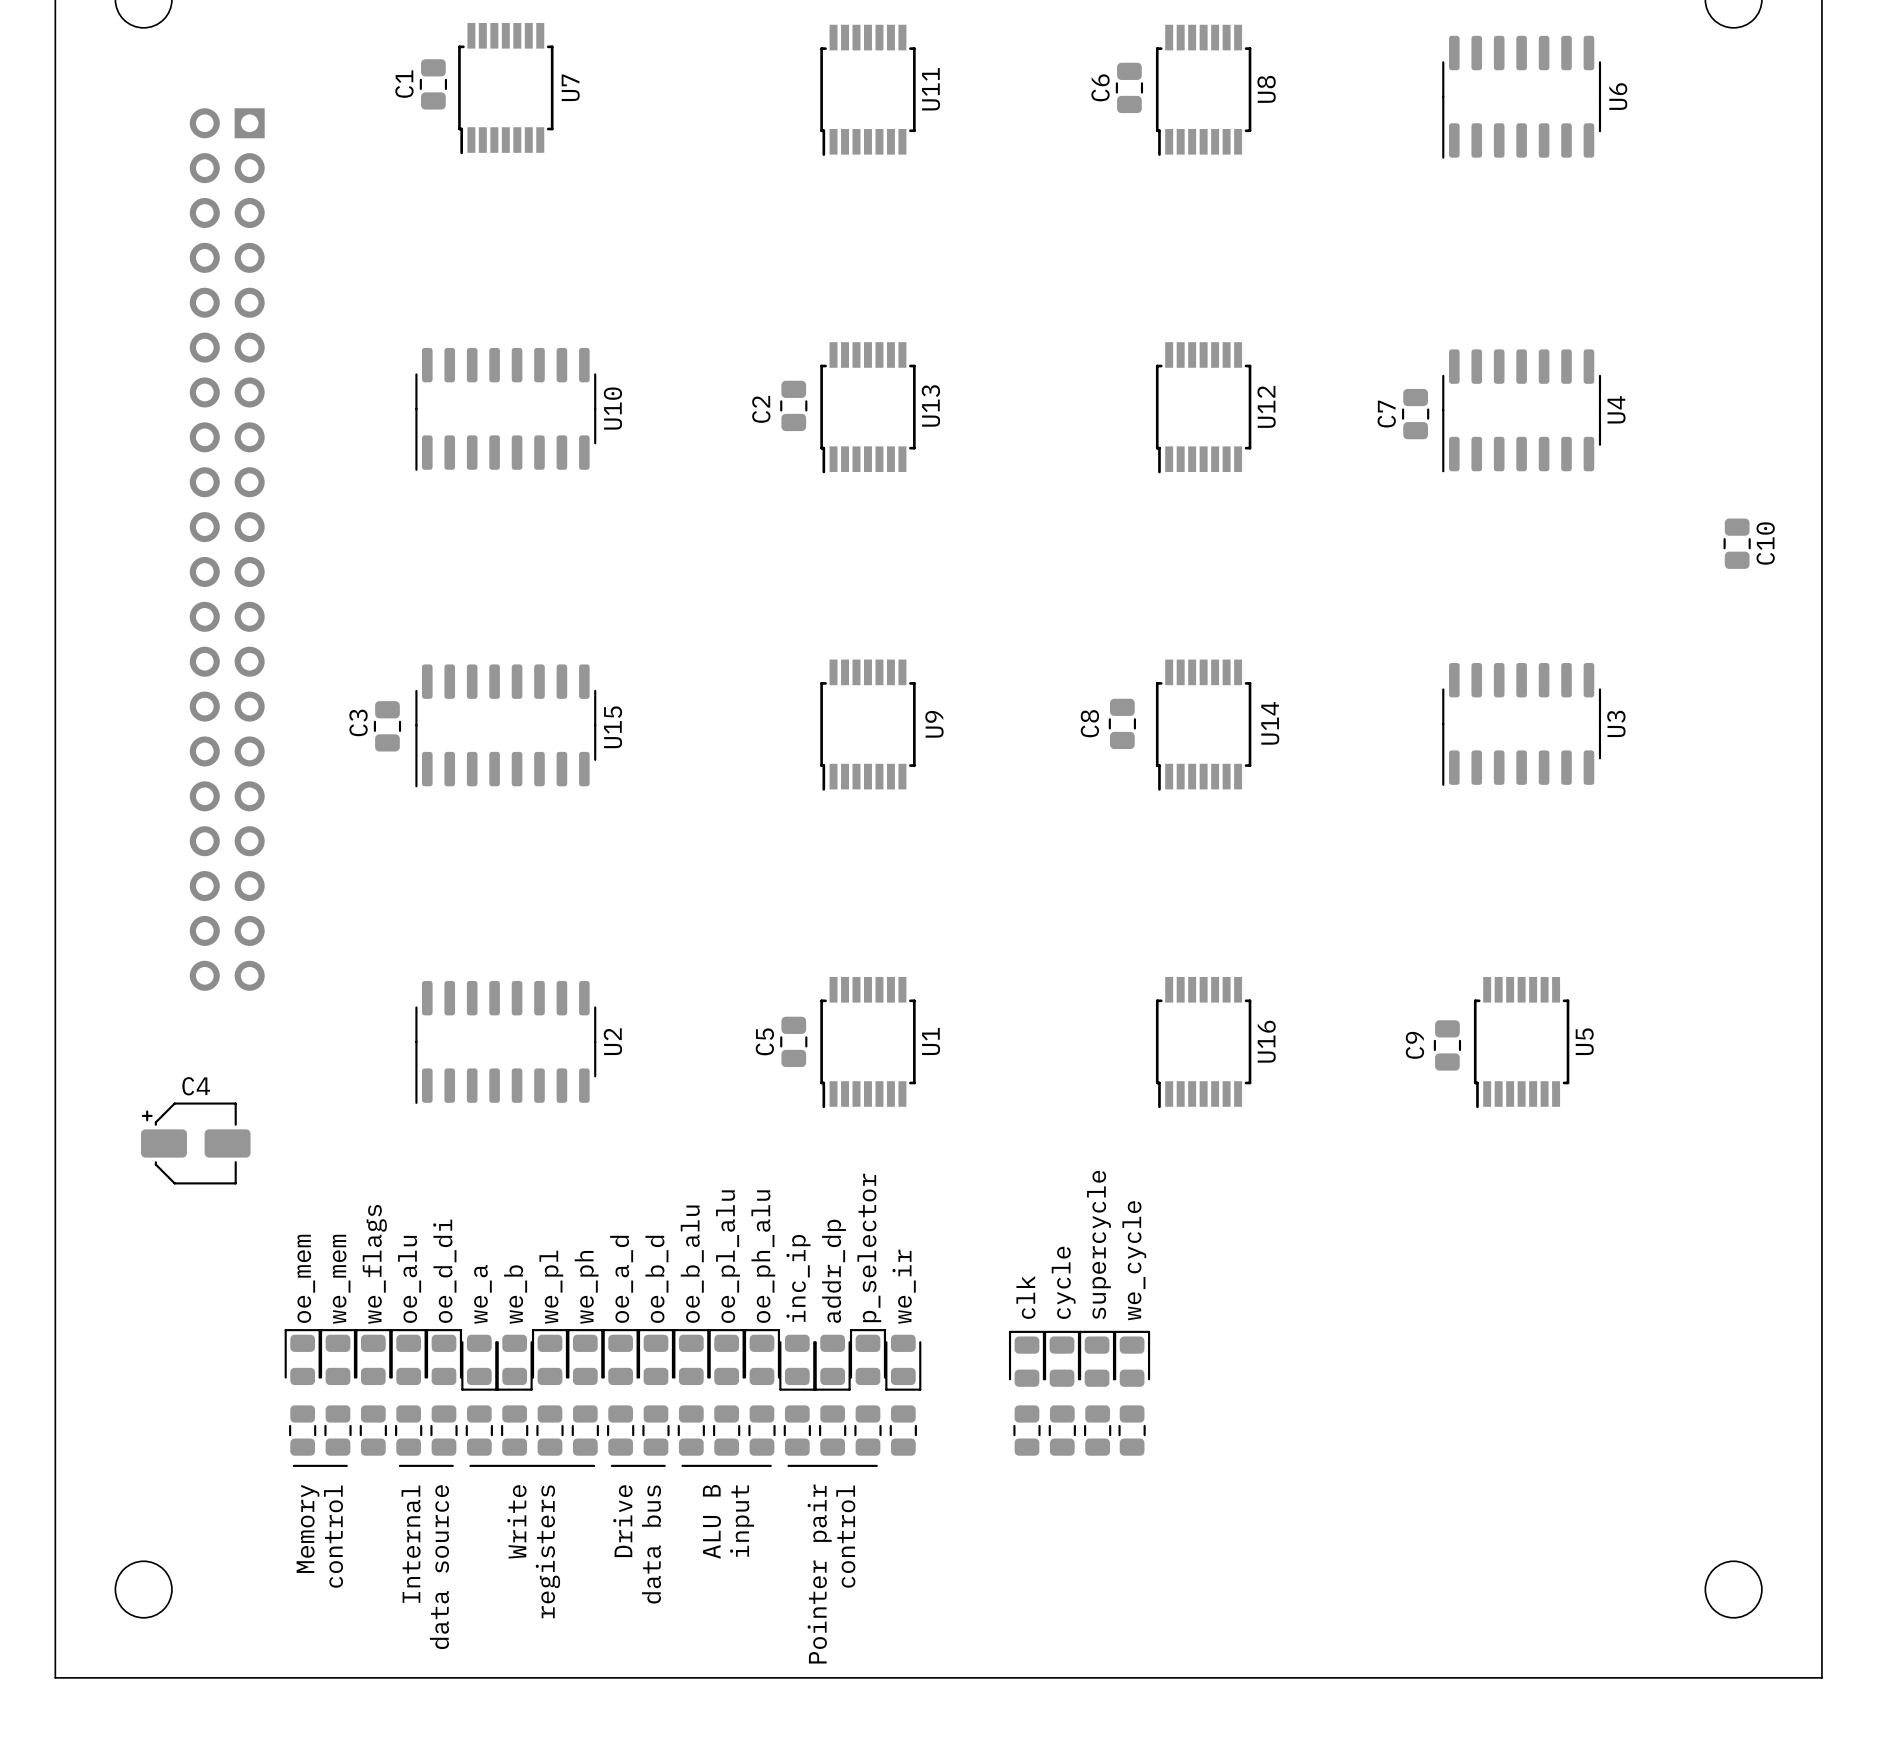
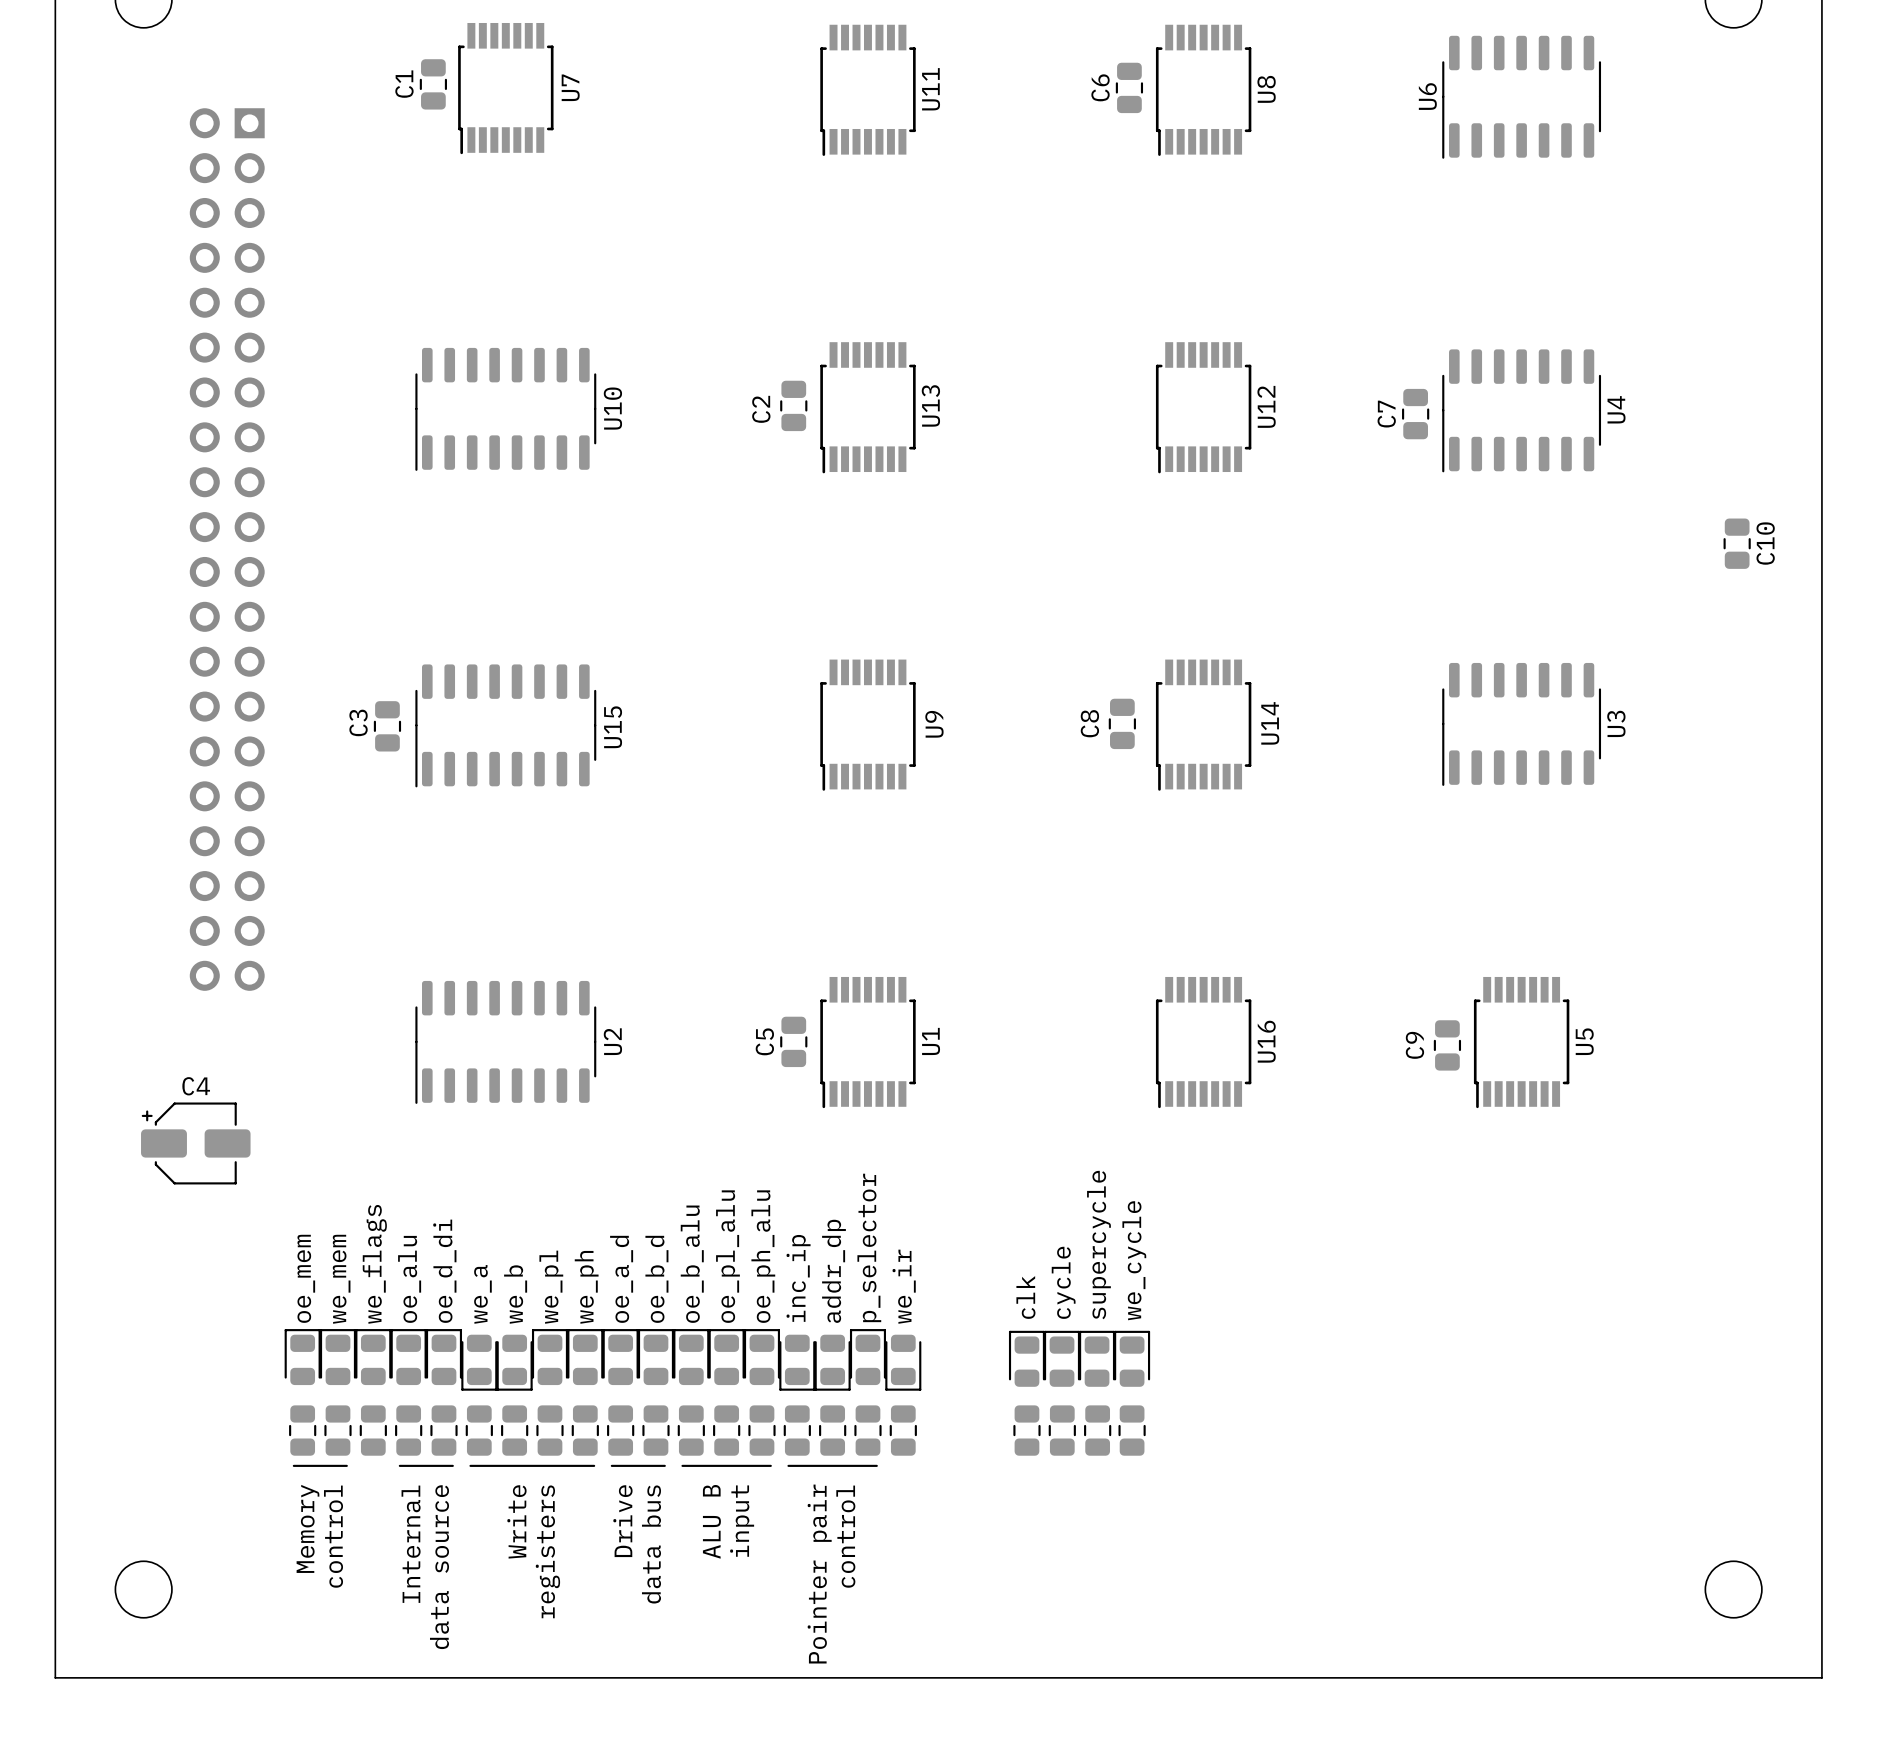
U6 name position: U6 (1618, 96) -> U6 (1427, 96)

